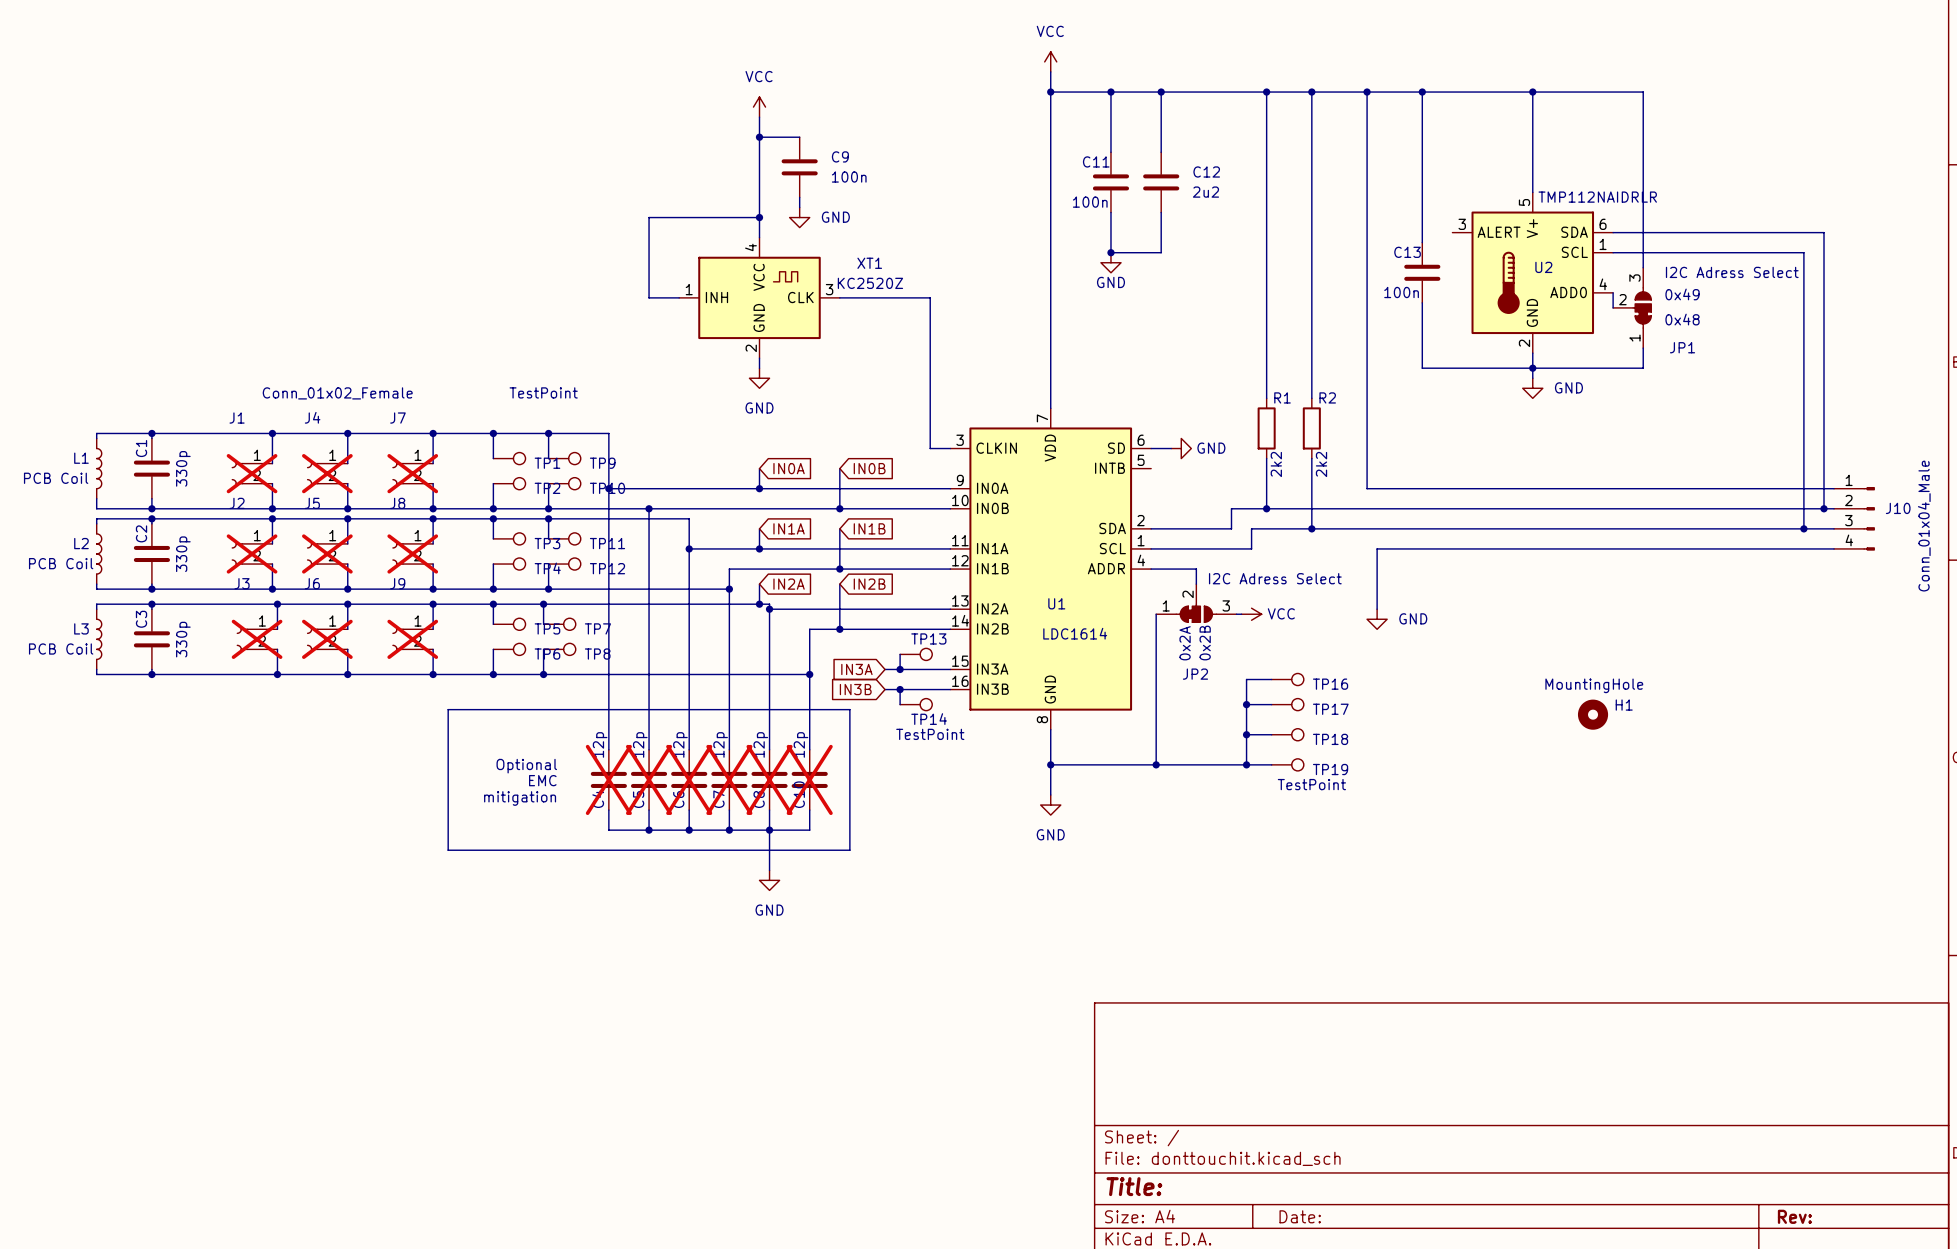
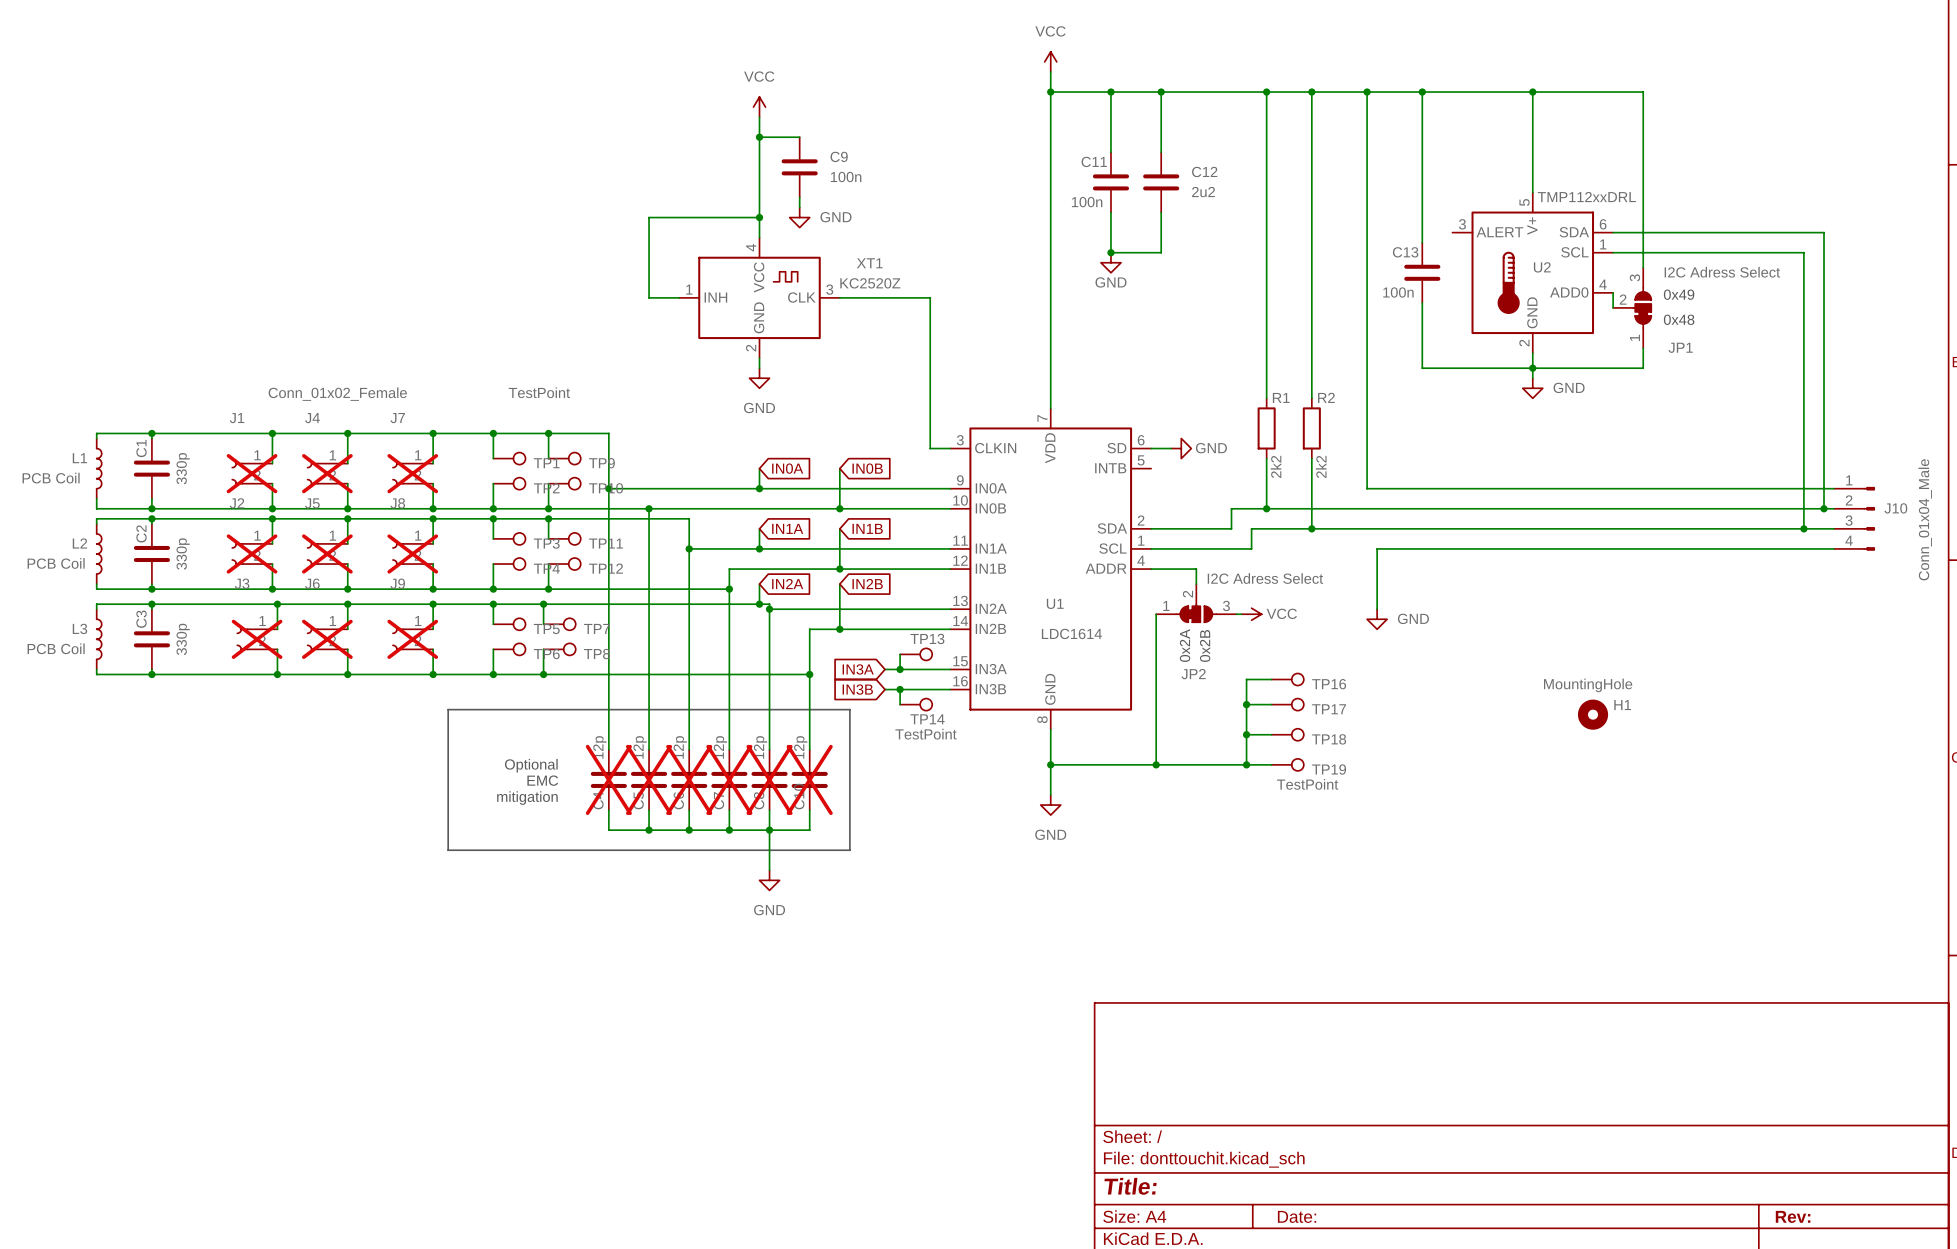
U2 value: TMP112NAIDRLR (1597, 197) -> TMP112xxDRL (1586, 197)

